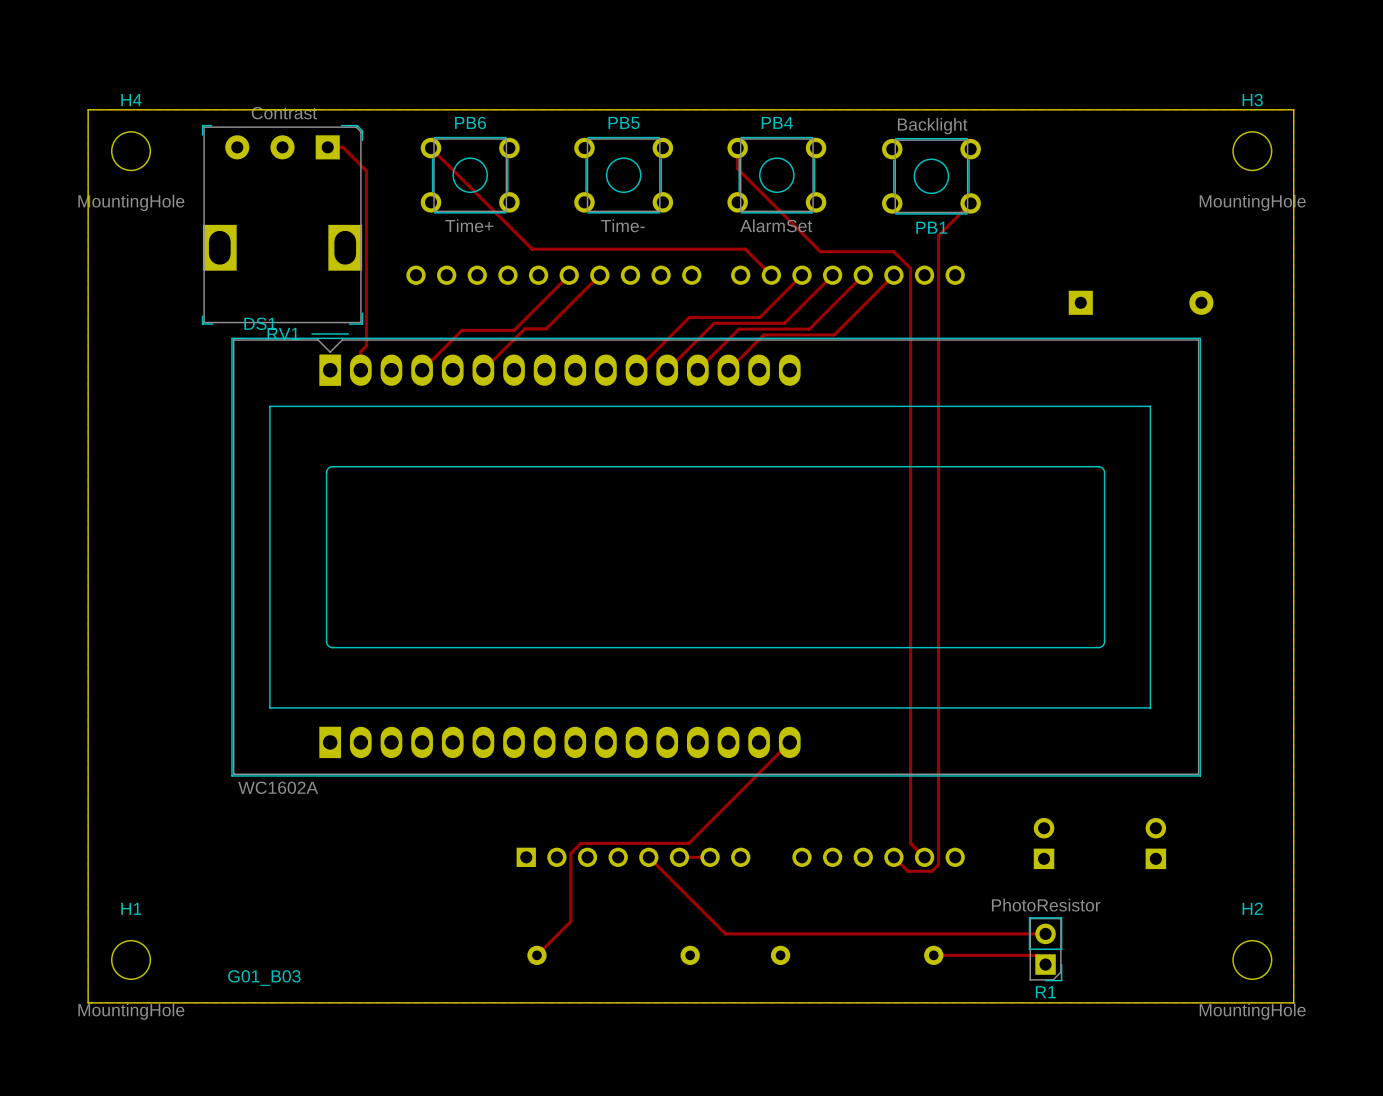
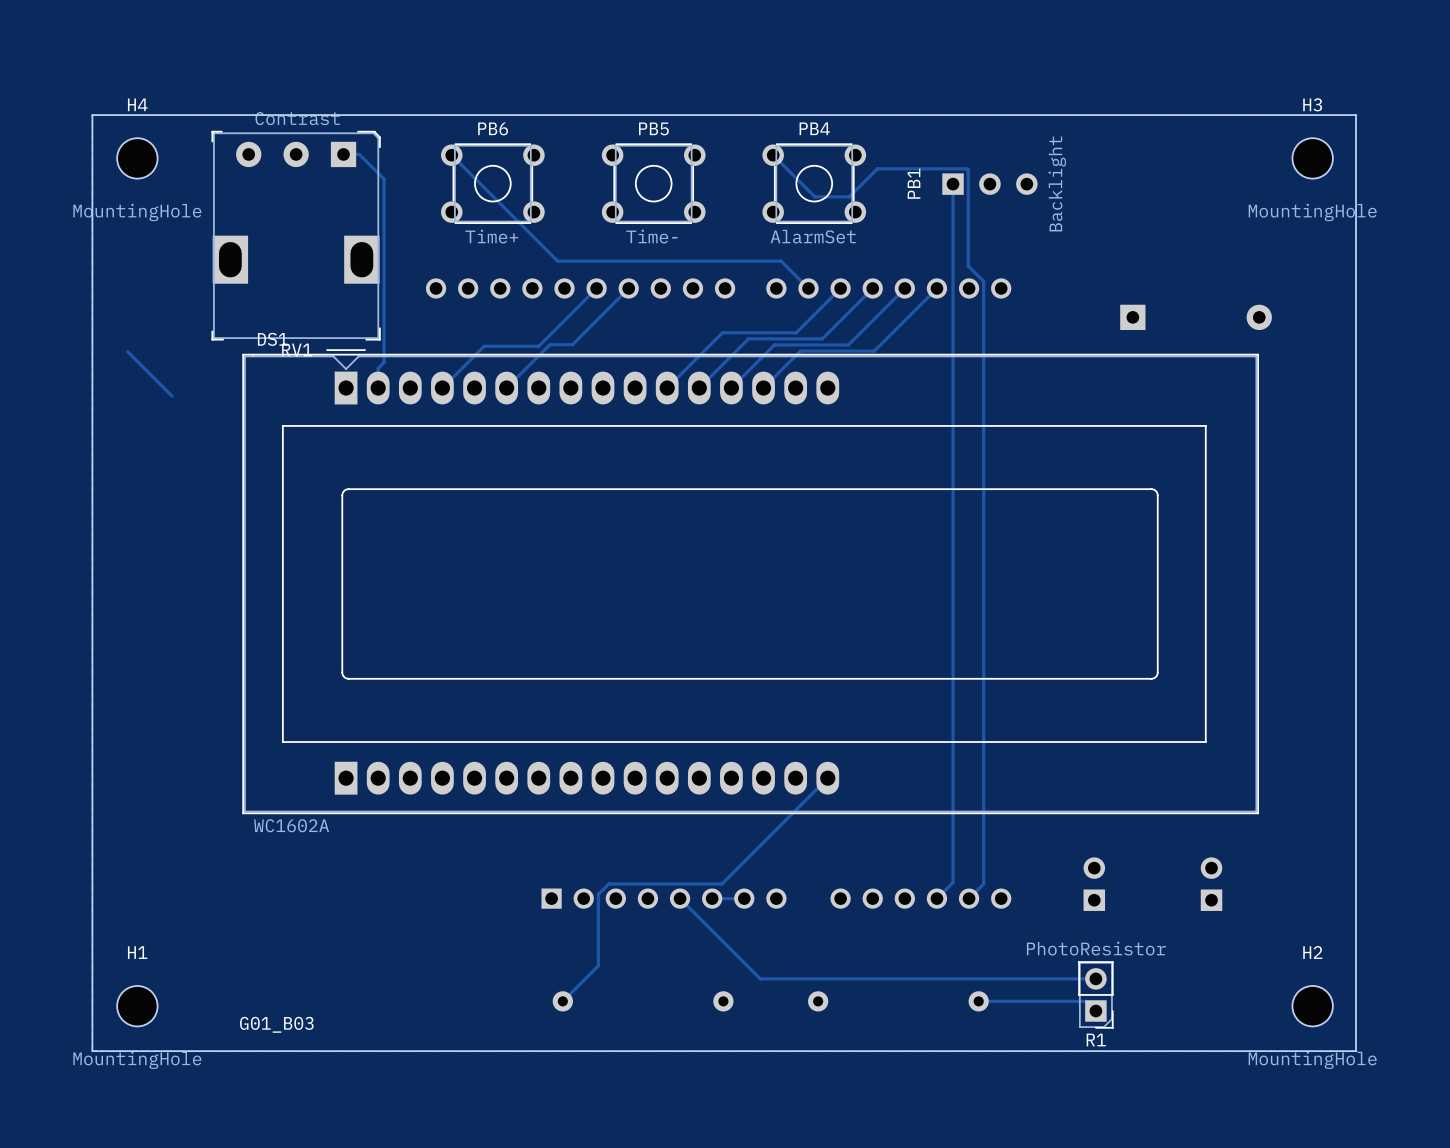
PB1 value position: Backlight (932, 126) -> Backlight (1057, 183)
PB1 footprint: [881, 137, 981, 215] -> [942, 173, 1038, 195]
track: (737, 148) (737, 168) (820, 251) (893, 251) (910, 268) (910, 843) (924, 857) -> none
track: none -> (953, 184) (953, 882) (936, 898)
track: (970, 203) (938, 235) (938, 268) -> (773, 155) (814, 196) (849, 196) (877, 168) (967, 168) (968, 266) (983, 281)
PB1 name position: PB1 (931, 227) -> PB1 (914, 183)
track: none -> (127, 351) (171, 396)
track: (938, 843) (938, 864) (931, 871) (907, 871) (893, 857) -> (983, 884) (969, 898)

